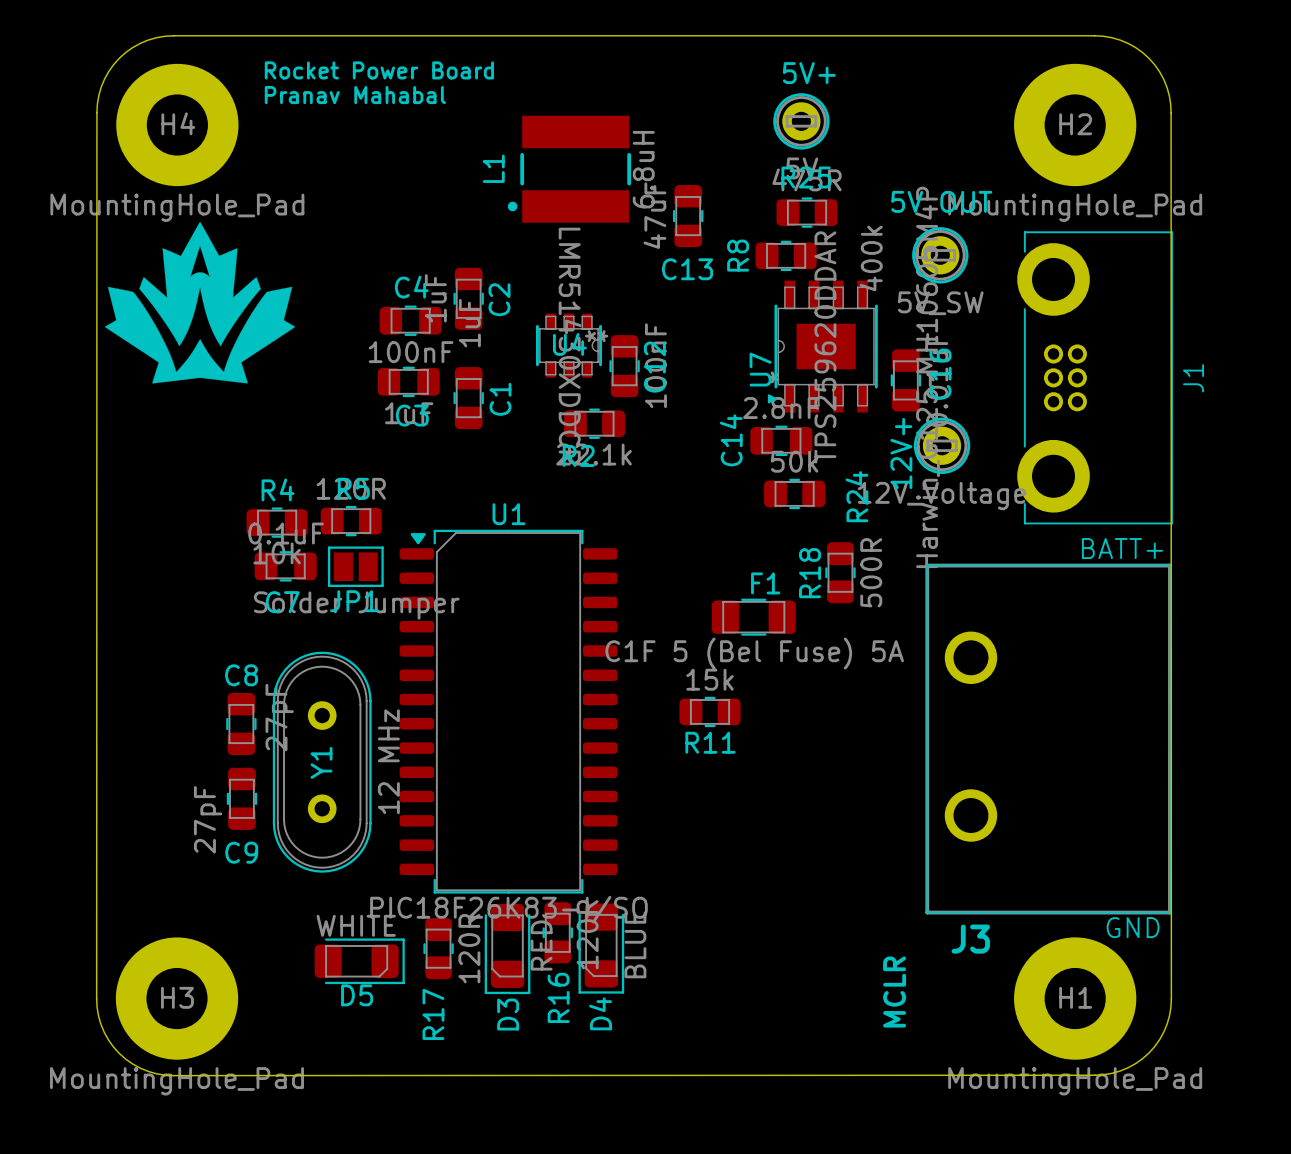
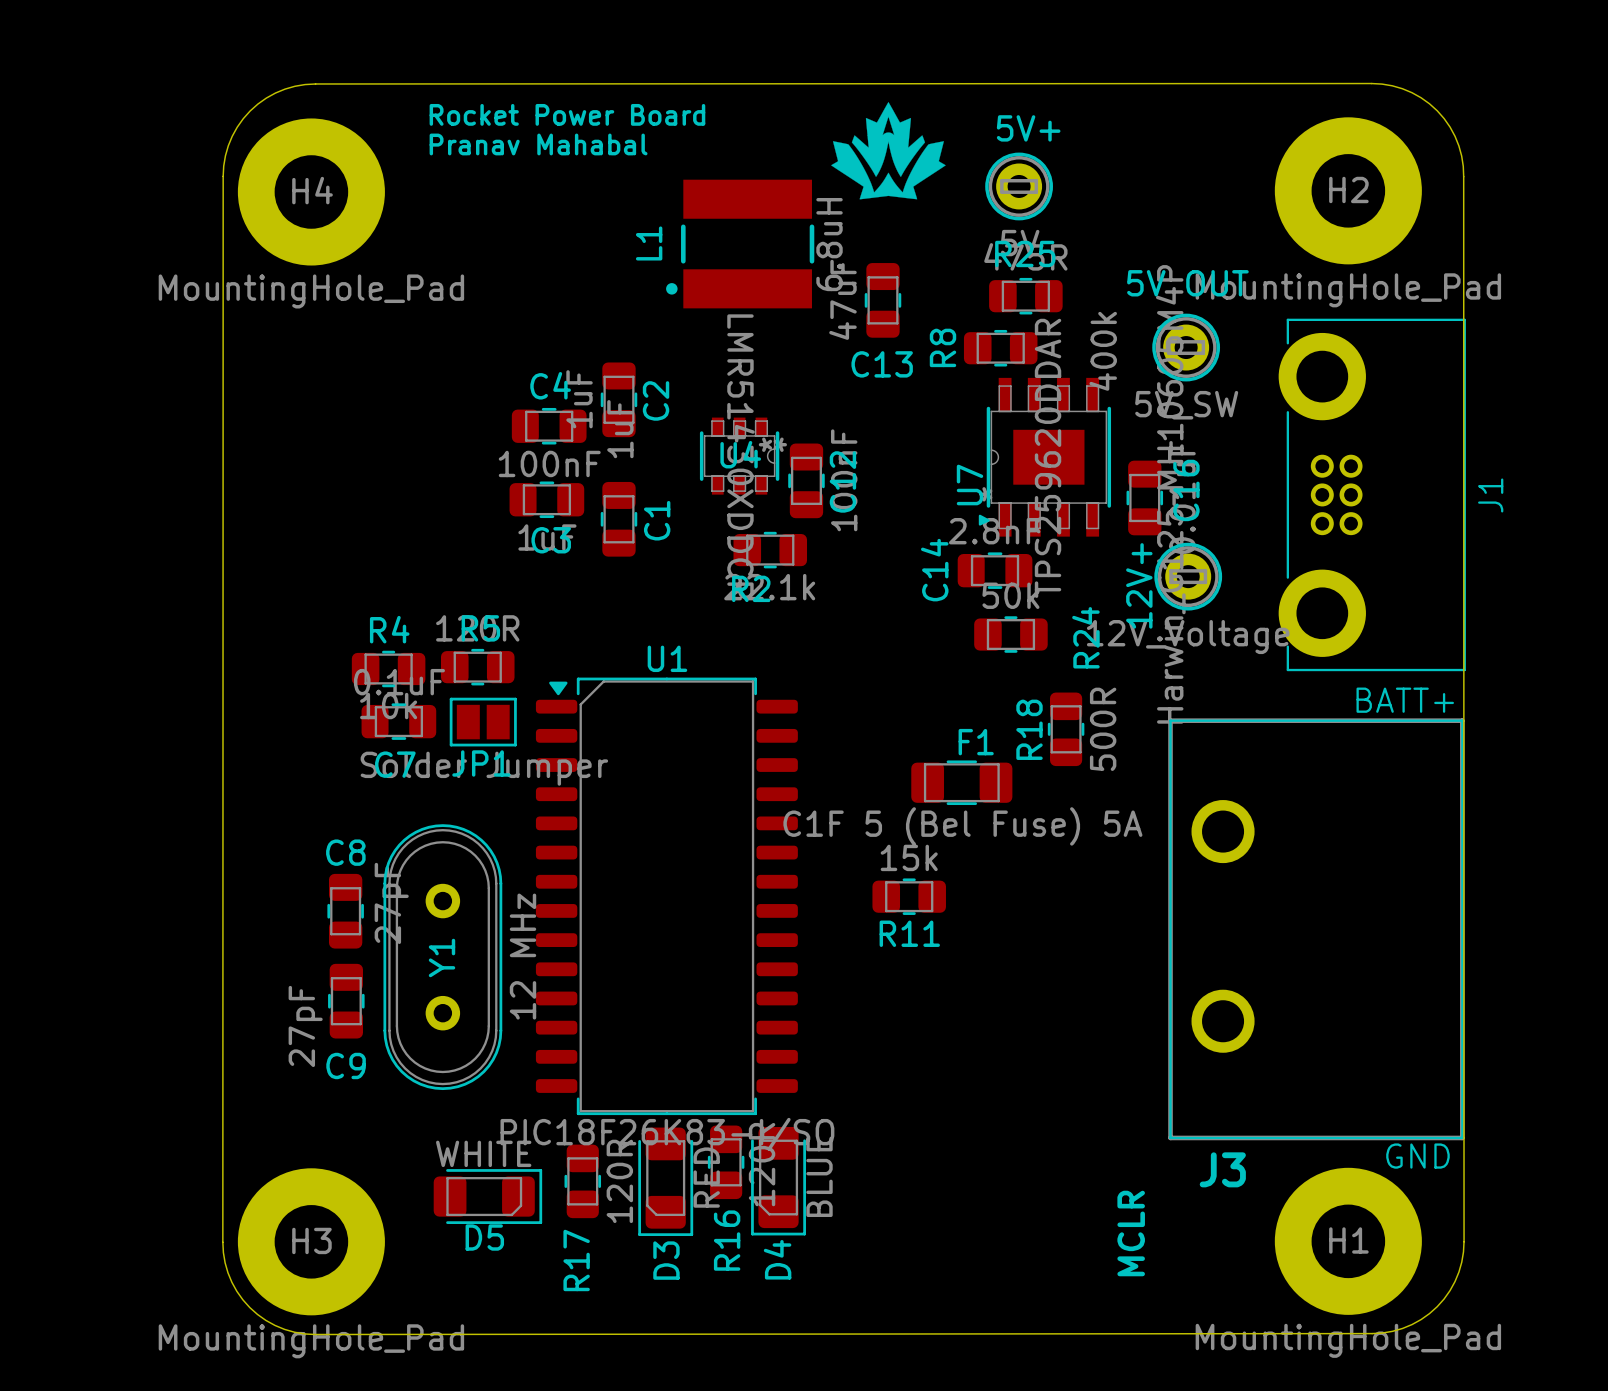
board edge: (1094, 35) (173, 35) (156, 37) (140, 43) (119, 58) (108, 71) (101, 87) (96, 112) (96, 998) (98, 1016) (104, 1032) (119, 1053) (140, 1068) (164, 1075) (1094, 1075) -> (1371, 83) (315, 84) (285, 89) (266, 98) (250, 110) (232, 136) (225, 155) (223, 176) (222, 1242) (227, 1272) (242, 1299) (257, 1314) (275, 1325) (304, 1333) (1372, 1333)
drawing: none -> [831, 102, 946, 200]
text position: Rocket Power Board (379, 70) -> Rocket Power Board (567, 114)
text position: Pranav Mahabal (355, 95) -> Pranav Mahabal (538, 144)
H4 position: (177, 125) -> (311, 191)
drawing: [104, 221, 296, 384] -> none
H3 position: (177, 998) -> (311, 1241)

